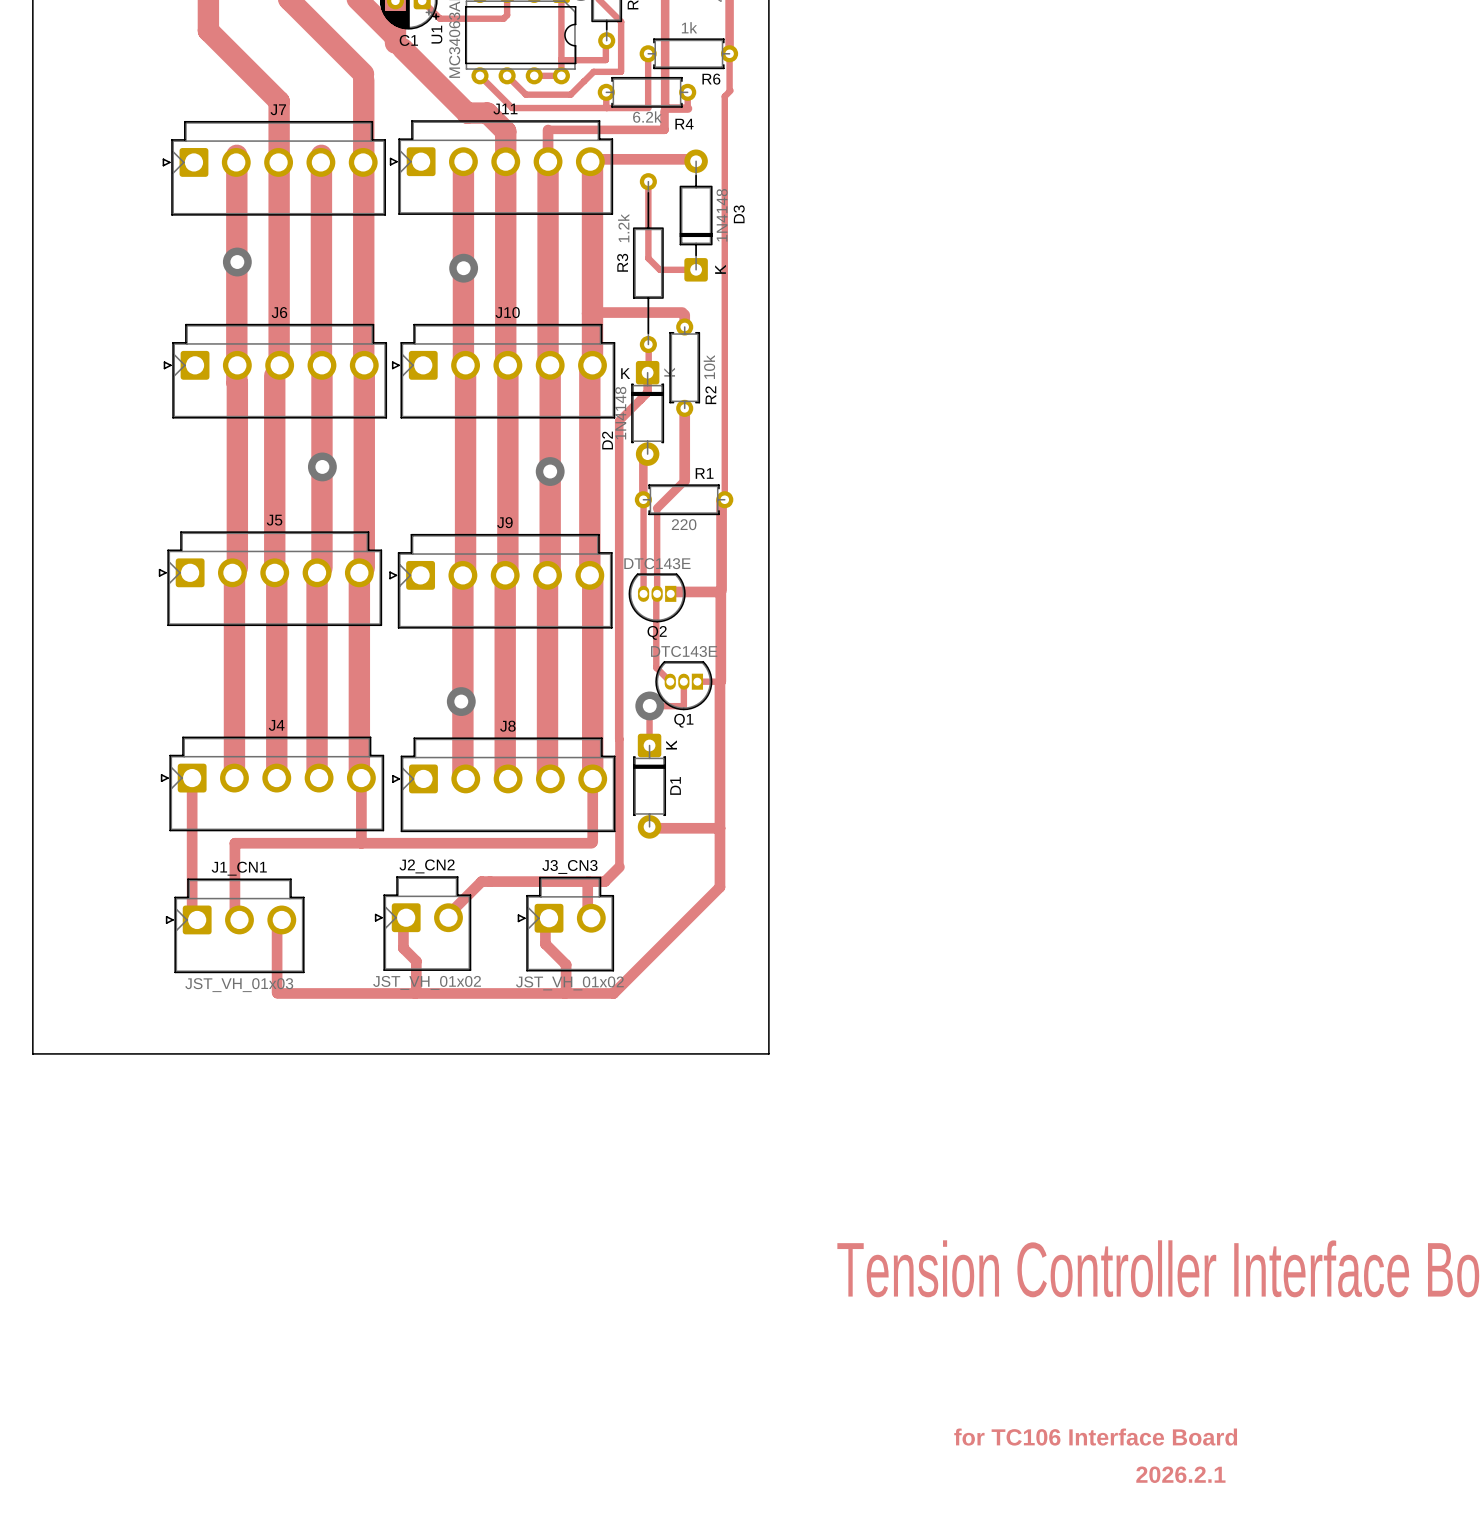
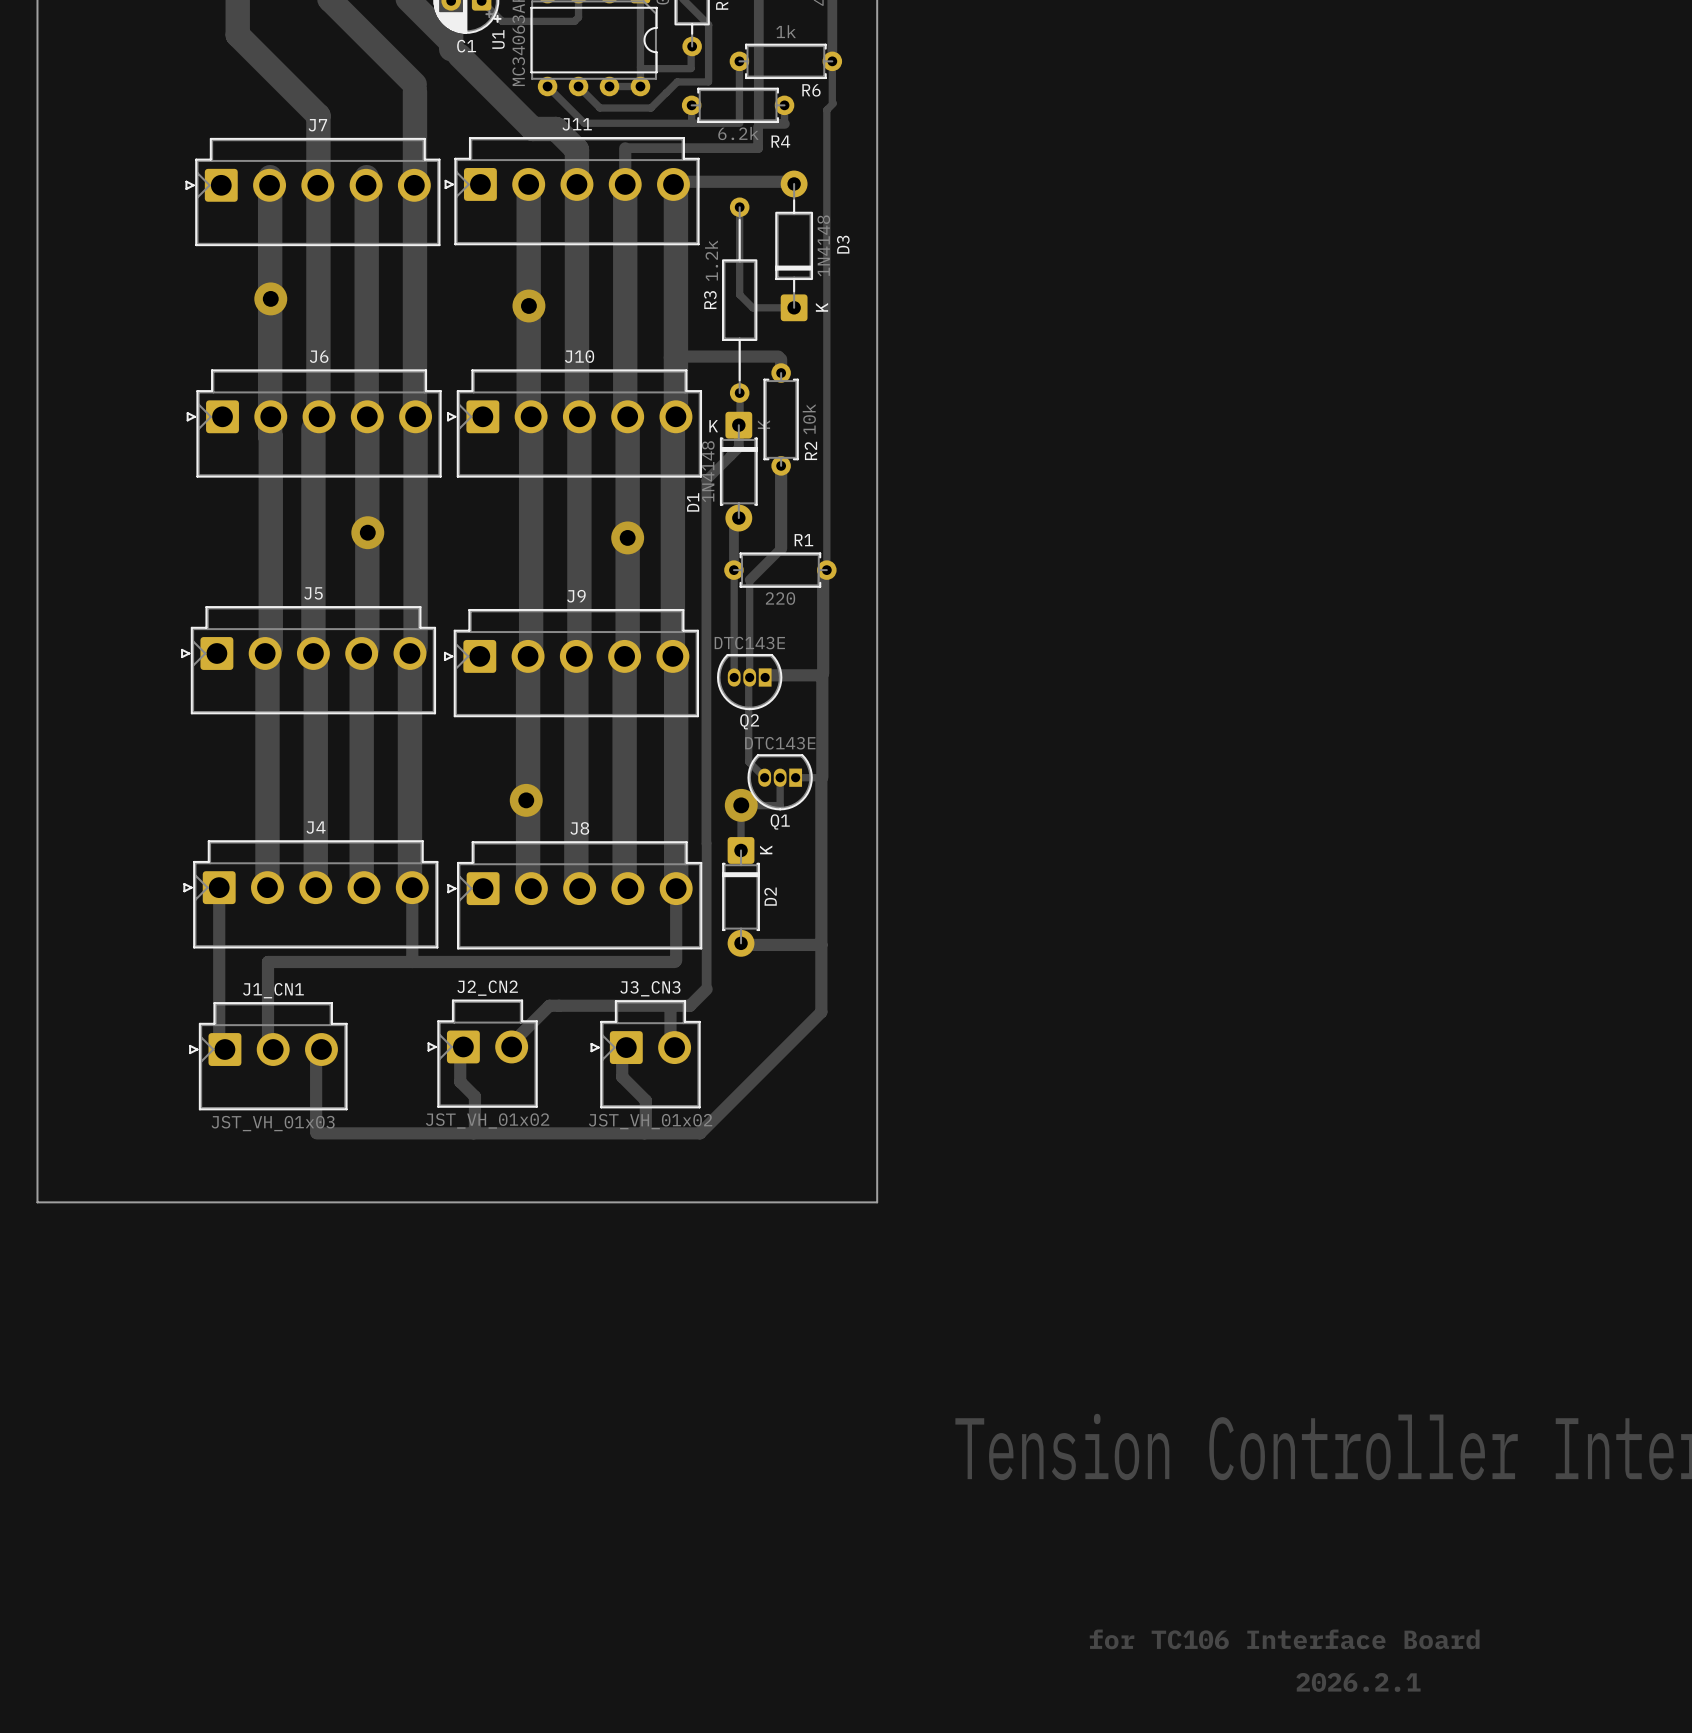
D2 name: D2 (607, 440) -> D1 (693, 502)
D1 name: D1 (675, 785) -> D2 (770, 896)

